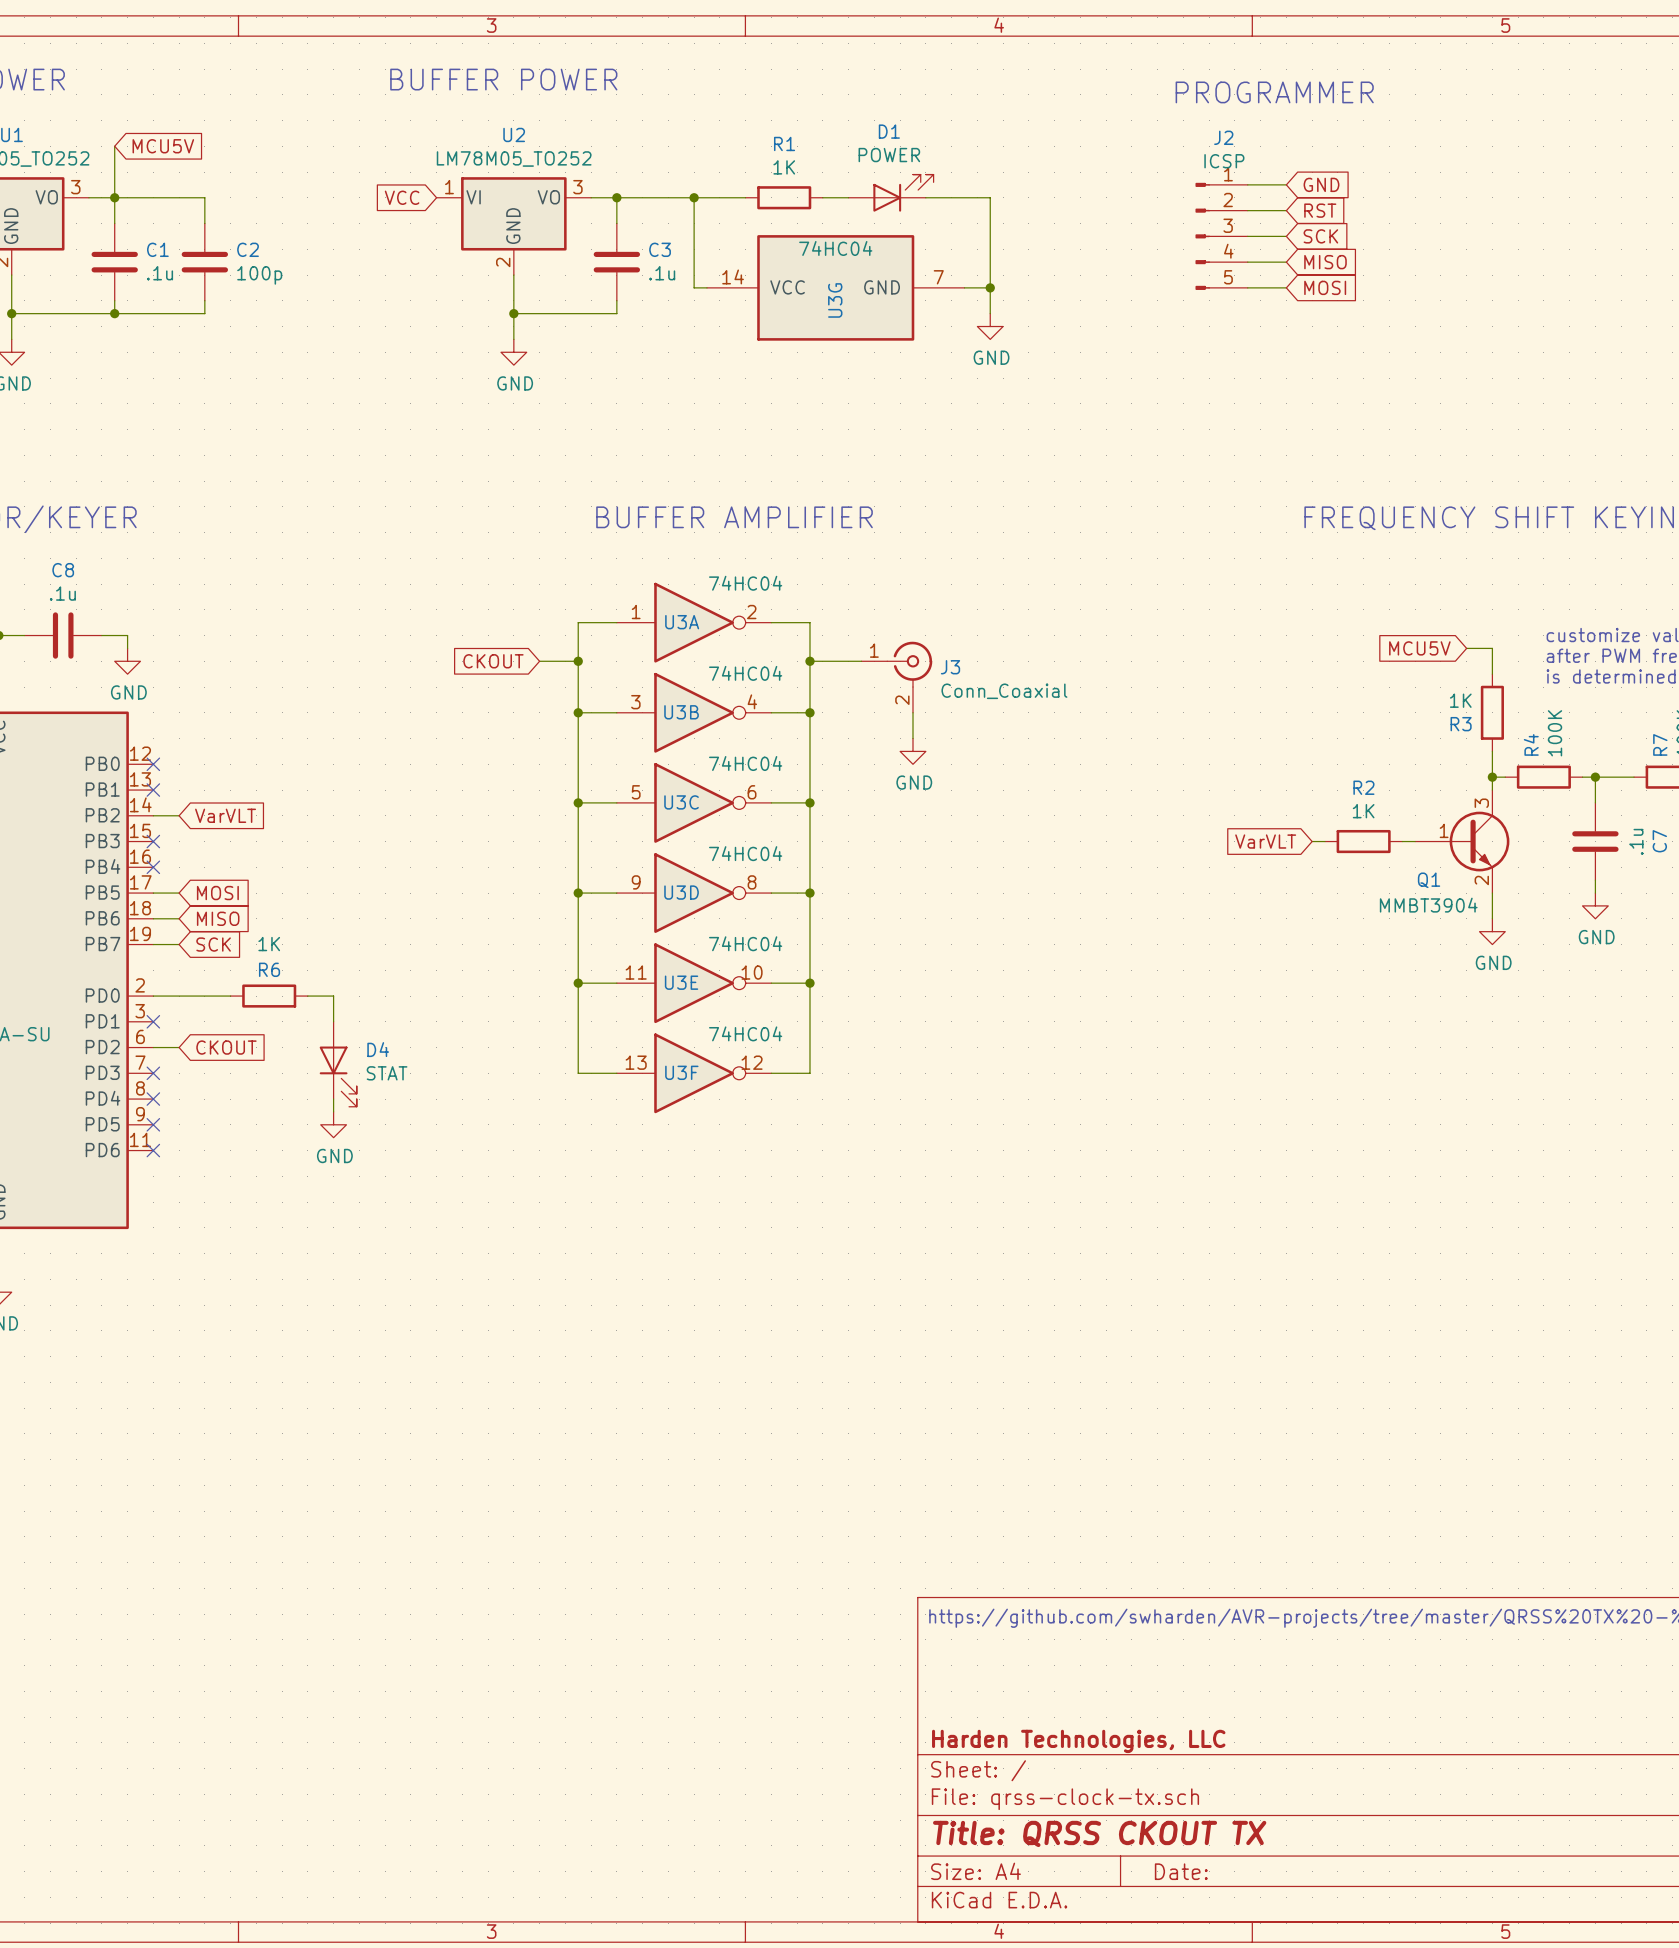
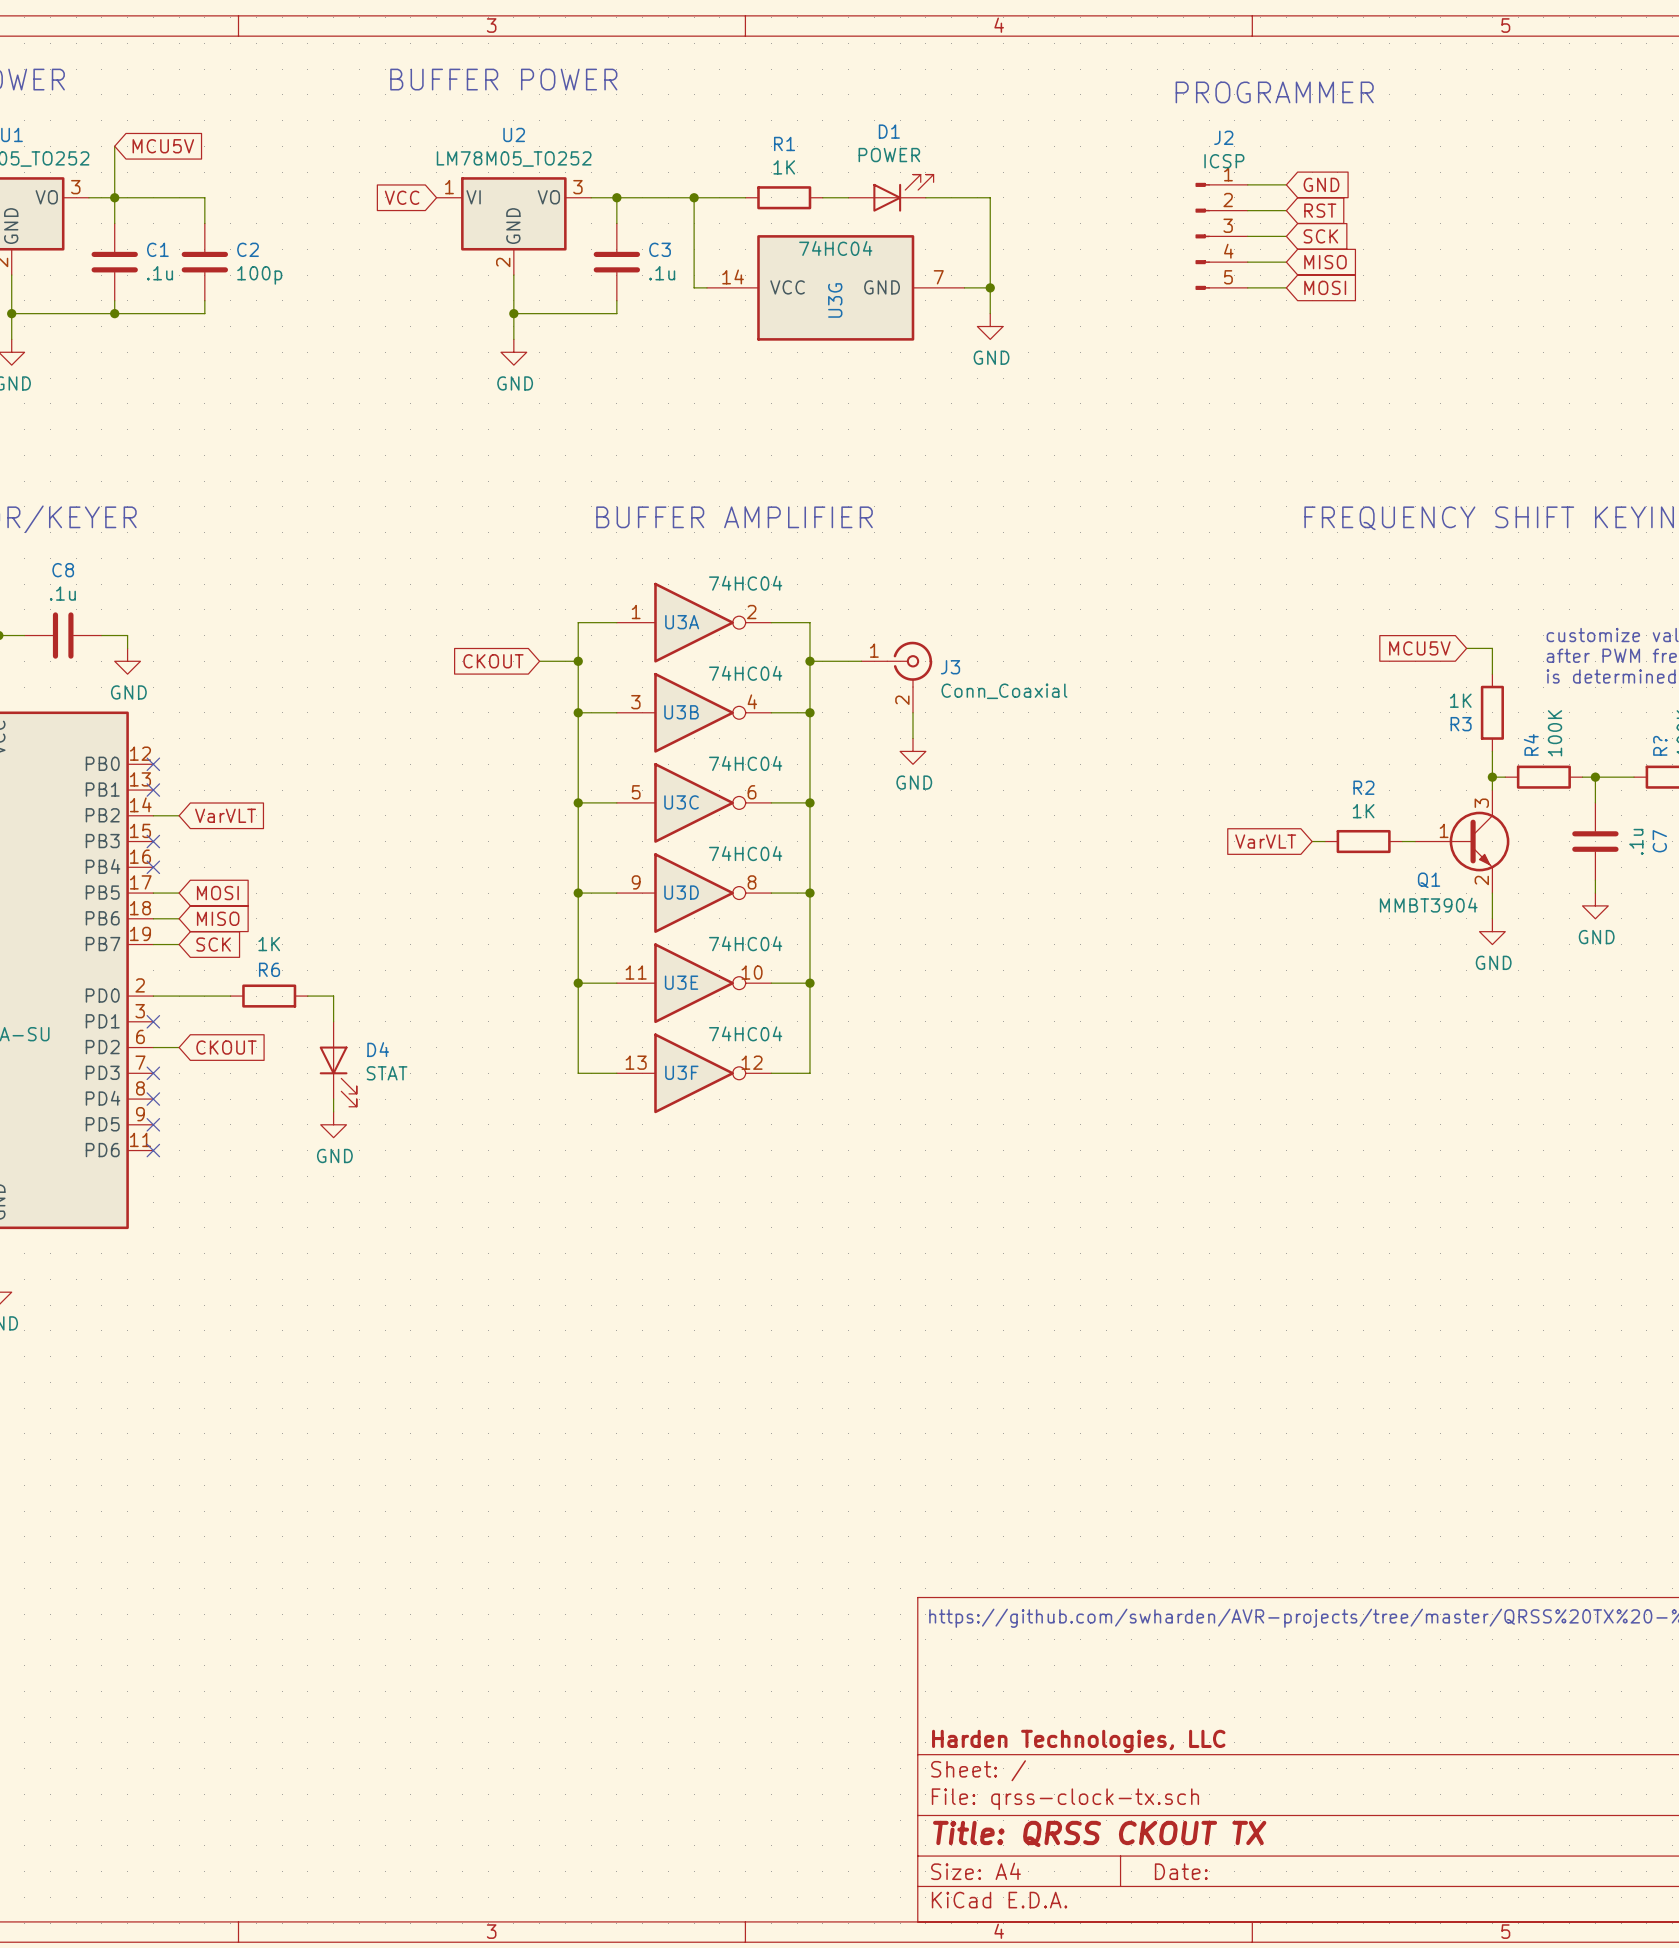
R7 name: R7 (1660, 744) -> R? (1660, 745)

